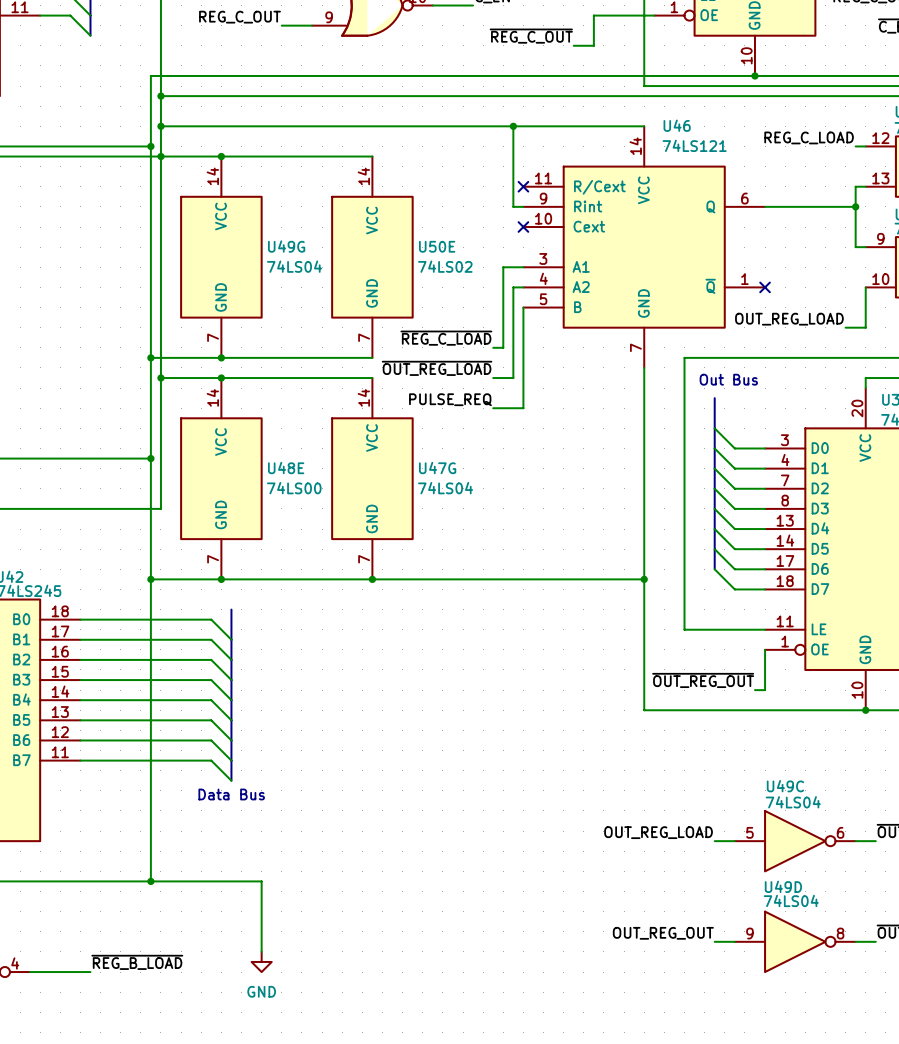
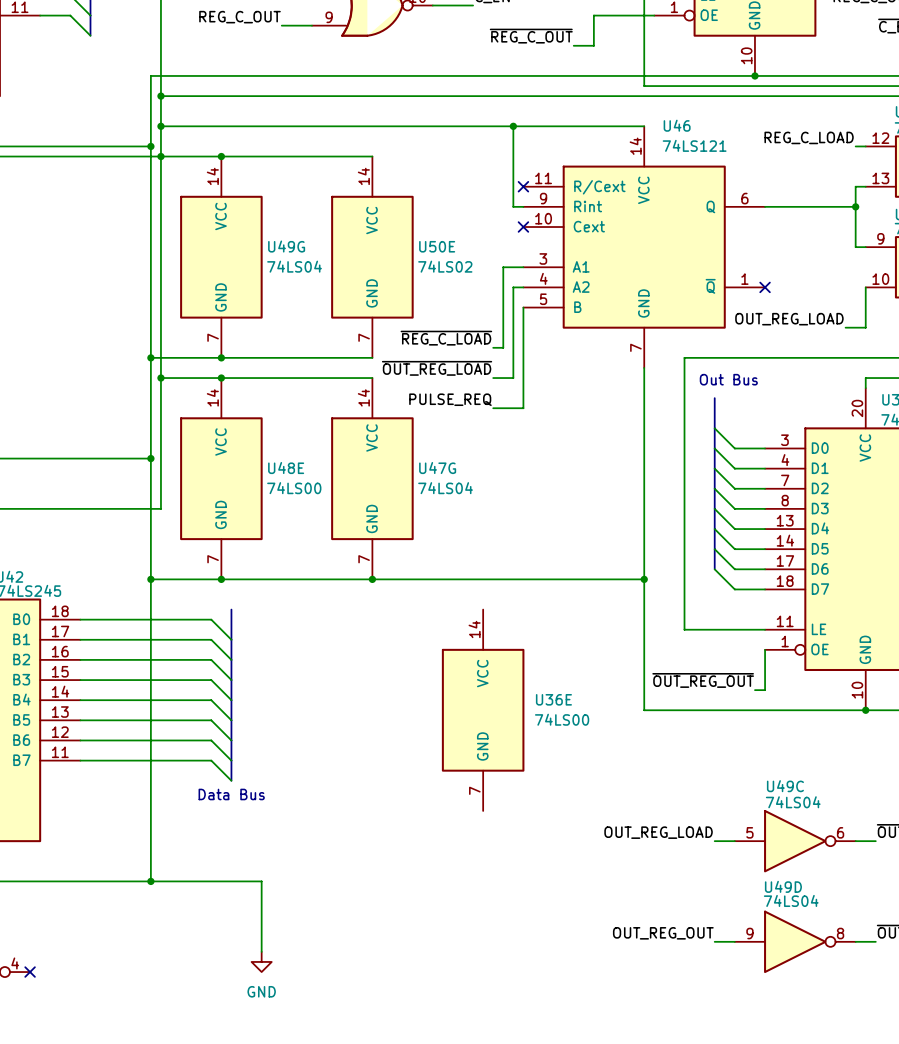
U36E: none -> 74LS00 (483, 710)
label: ~{REG_B_LOAD} (137, 962) -> none
wire: (30, 972) (90, 972) -> none
no-connect mark: none -> (30, 972)

